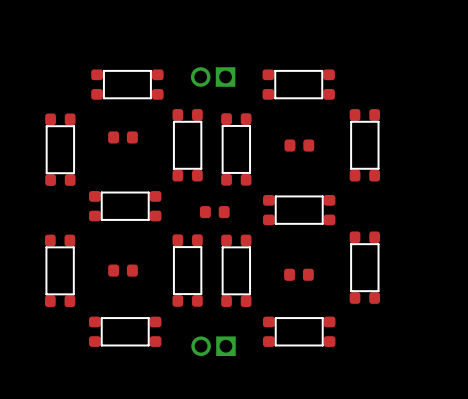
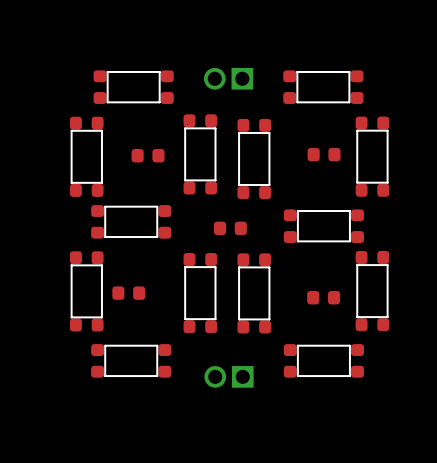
part position: (123, 137) -> (148, 155)
part position: (364, 145) -> (372, 156)
part position: (60, 149) -> (86, 156)
part position: (364, 267) -> (372, 291)
part position: (60, 270) -> (86, 291)

